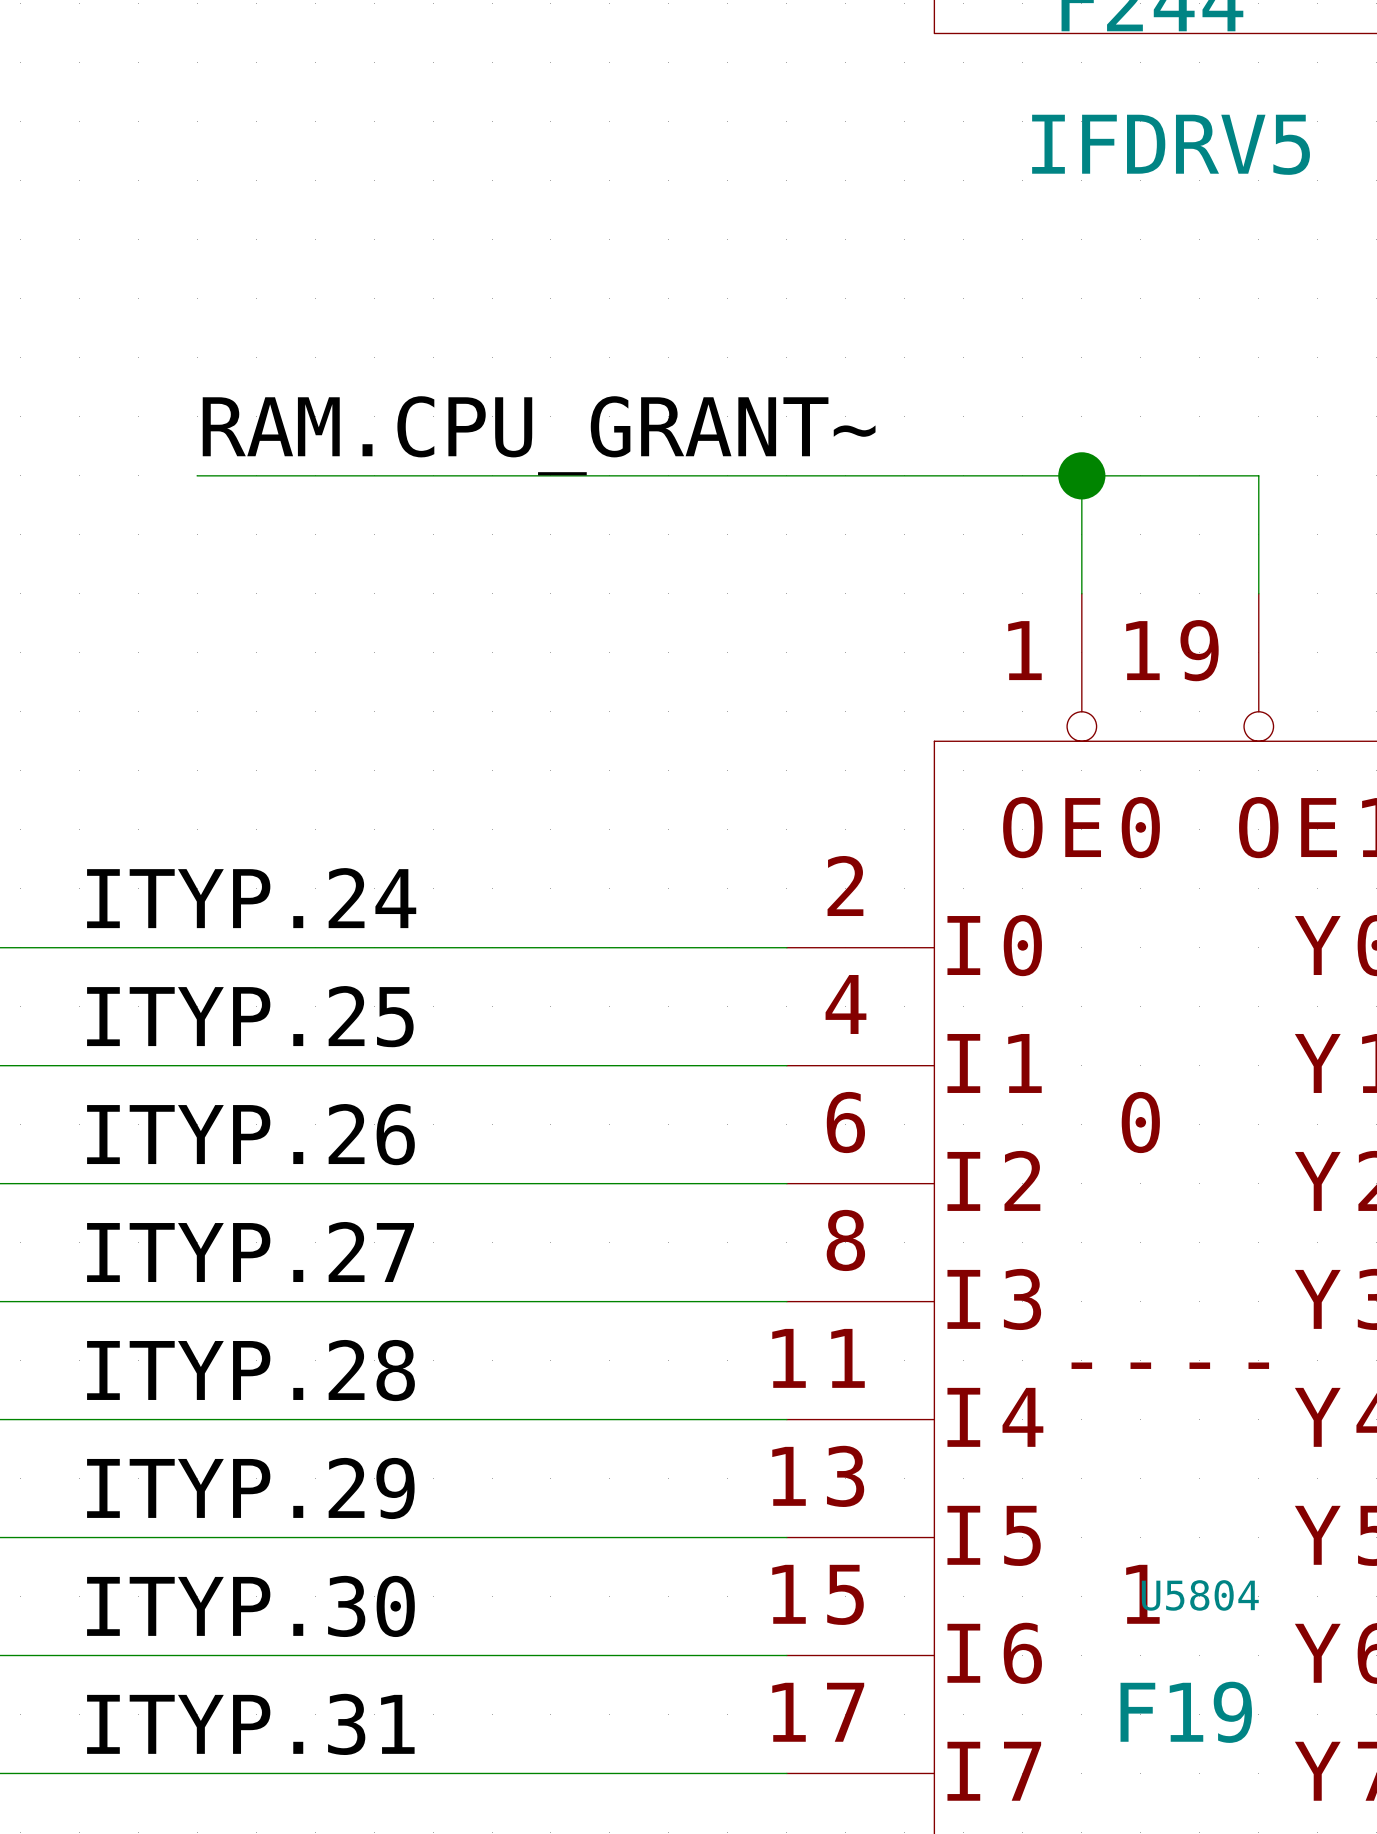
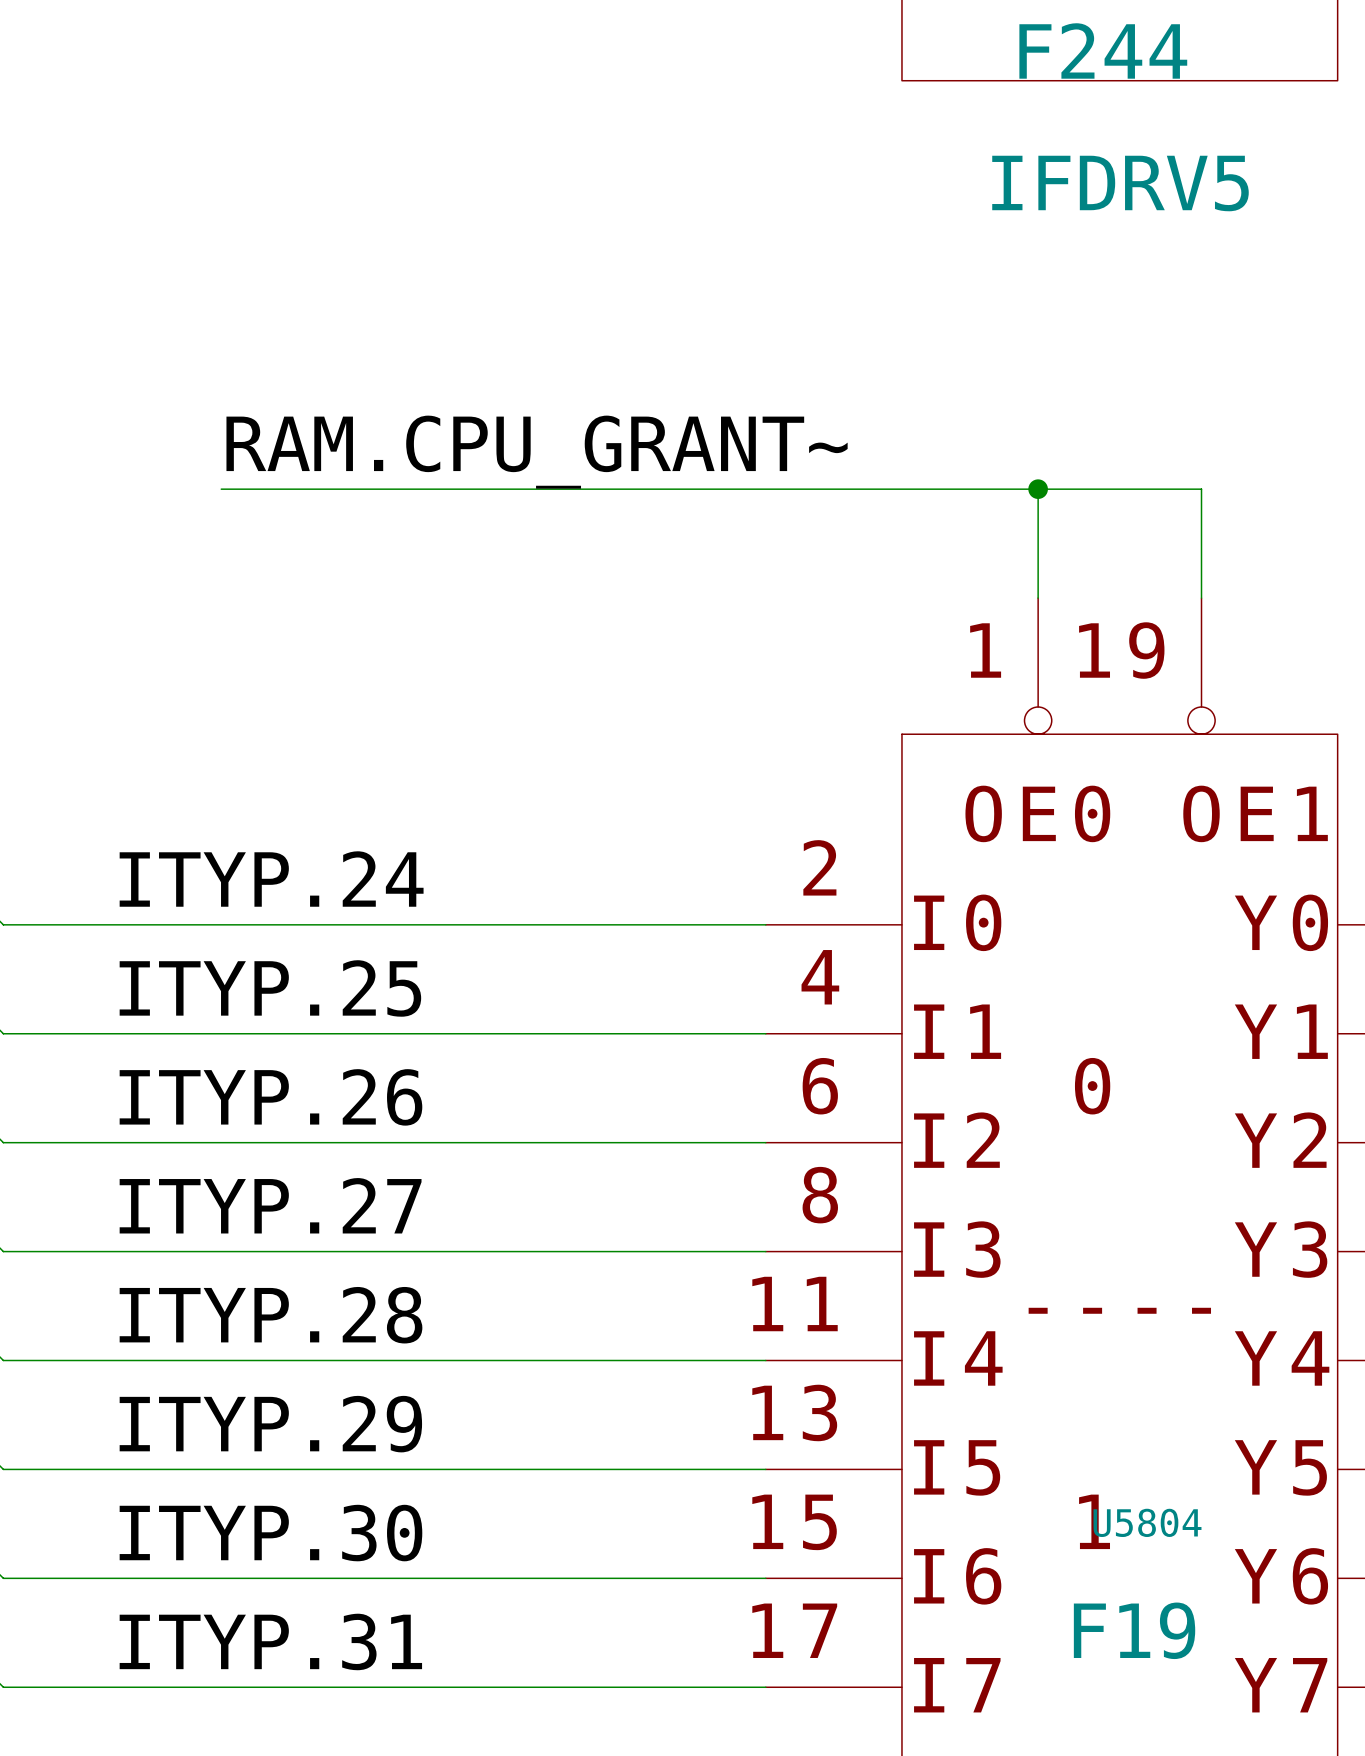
junction size: [1058, 452, 1106, 500] -> [1028, 479, 1048, 499]

